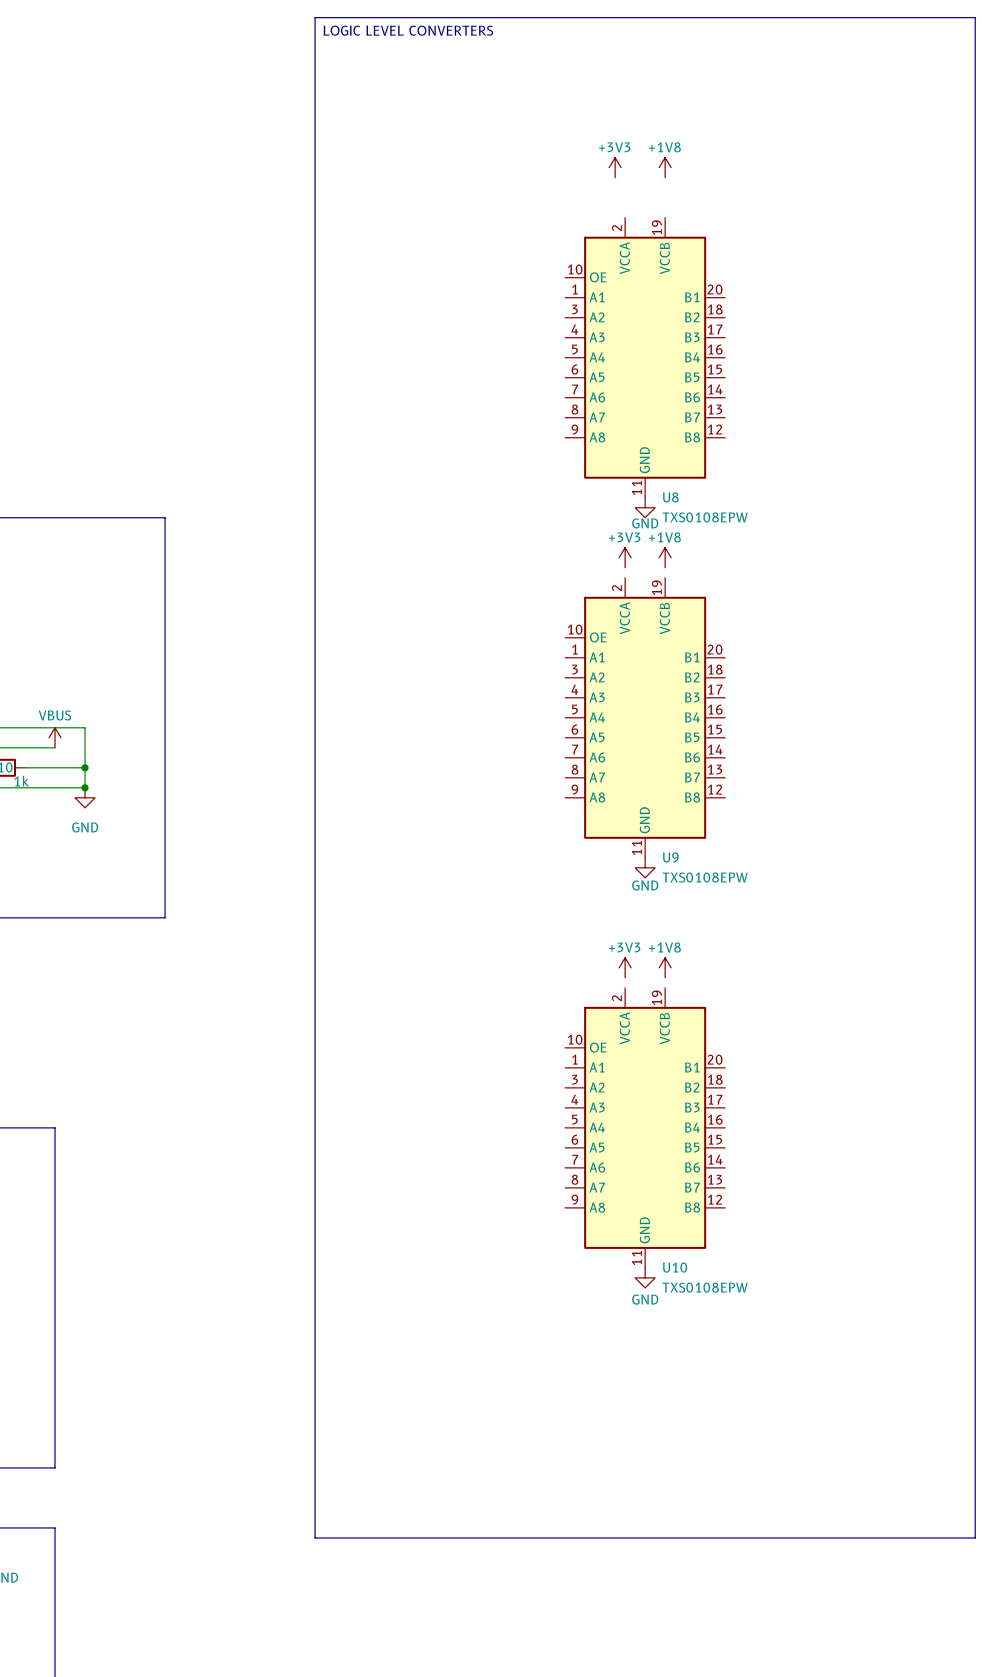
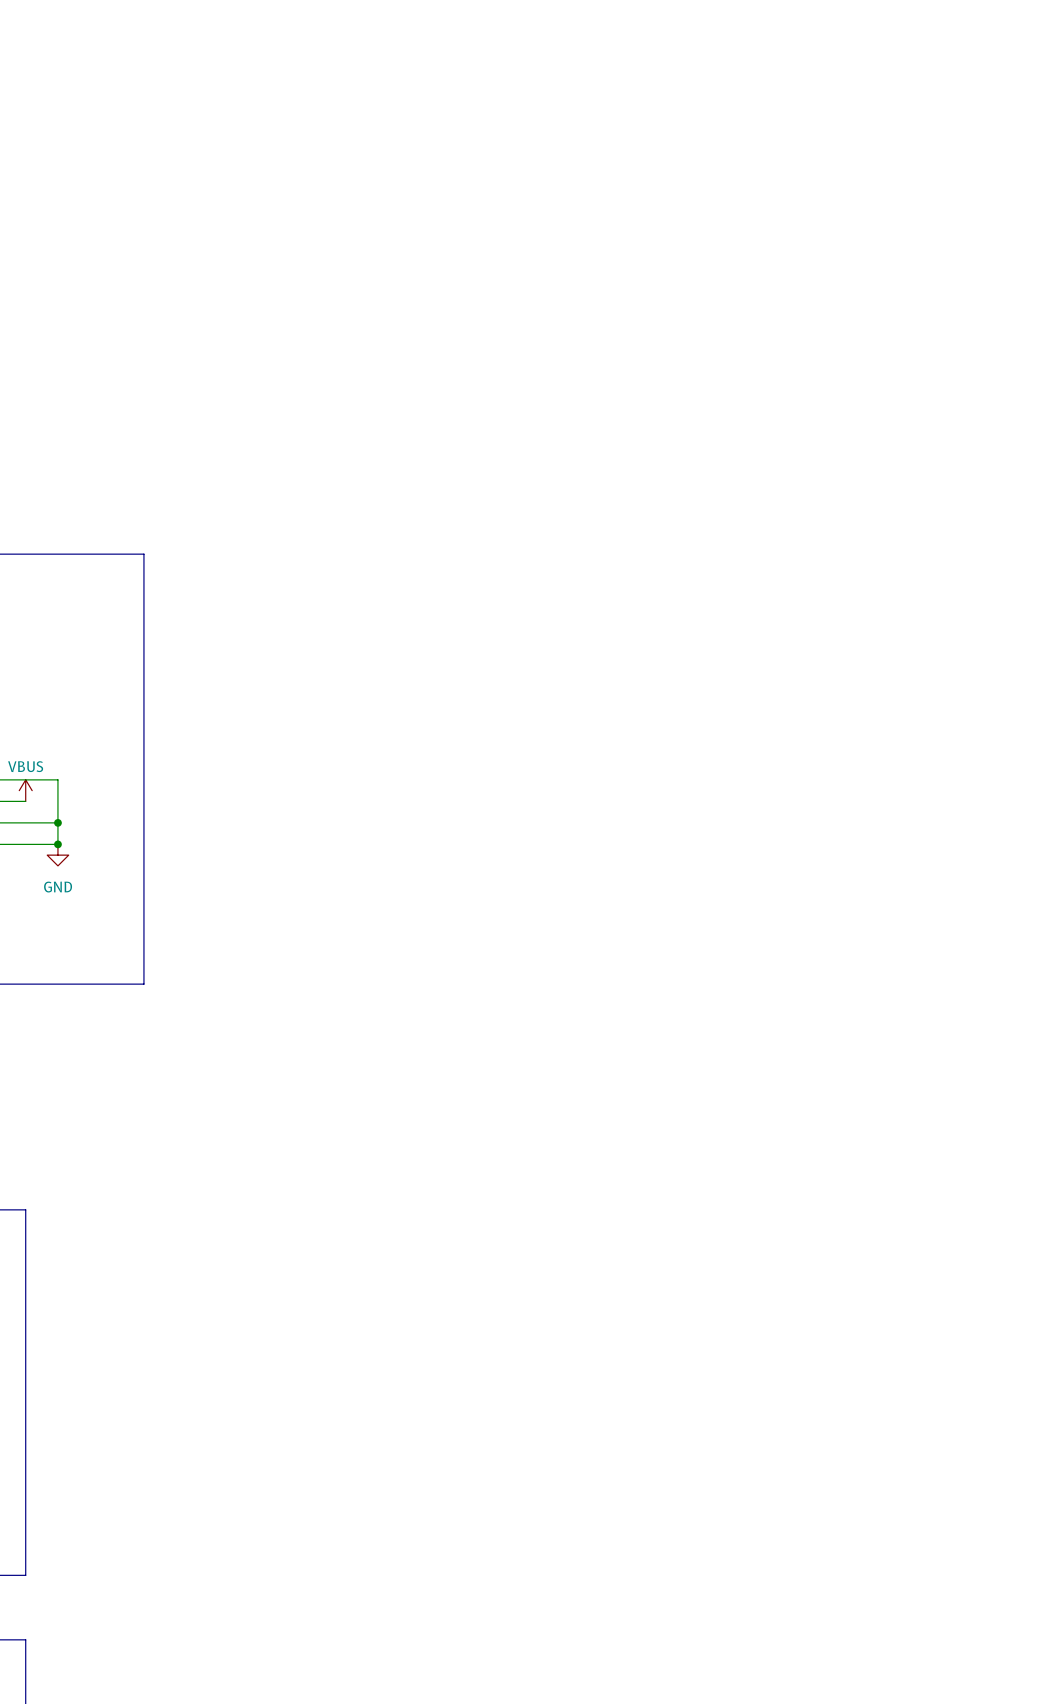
line: (315, 17) (975, 17) (975, 1537) (315, 1537) (315, 17) -> none
text: LOGIC LEVEL CONVERTERS (408, 30) -> none
power symbol: +3V3 (615, 167) -> none
power symbol: +1V8 (665, 167) -> none
U8: TXS0108EPW (645, 357) -> none
power symbol: GND (645, 507) -> none
power symbol: +3V3 (625, 557) -> none
power symbol: +1V8 (665, 557) -> none
U9: TXS0108EPW (645, 717) -> none
power symbol: GND (645, 867) -> none
power symbol: +3V3 (625, 967) -> none
power symbol: +1V8 (665, 967) -> none
U10: TXS0108EPW (645, 1127) -> none
power symbol: GND (645, 1277) -> none

